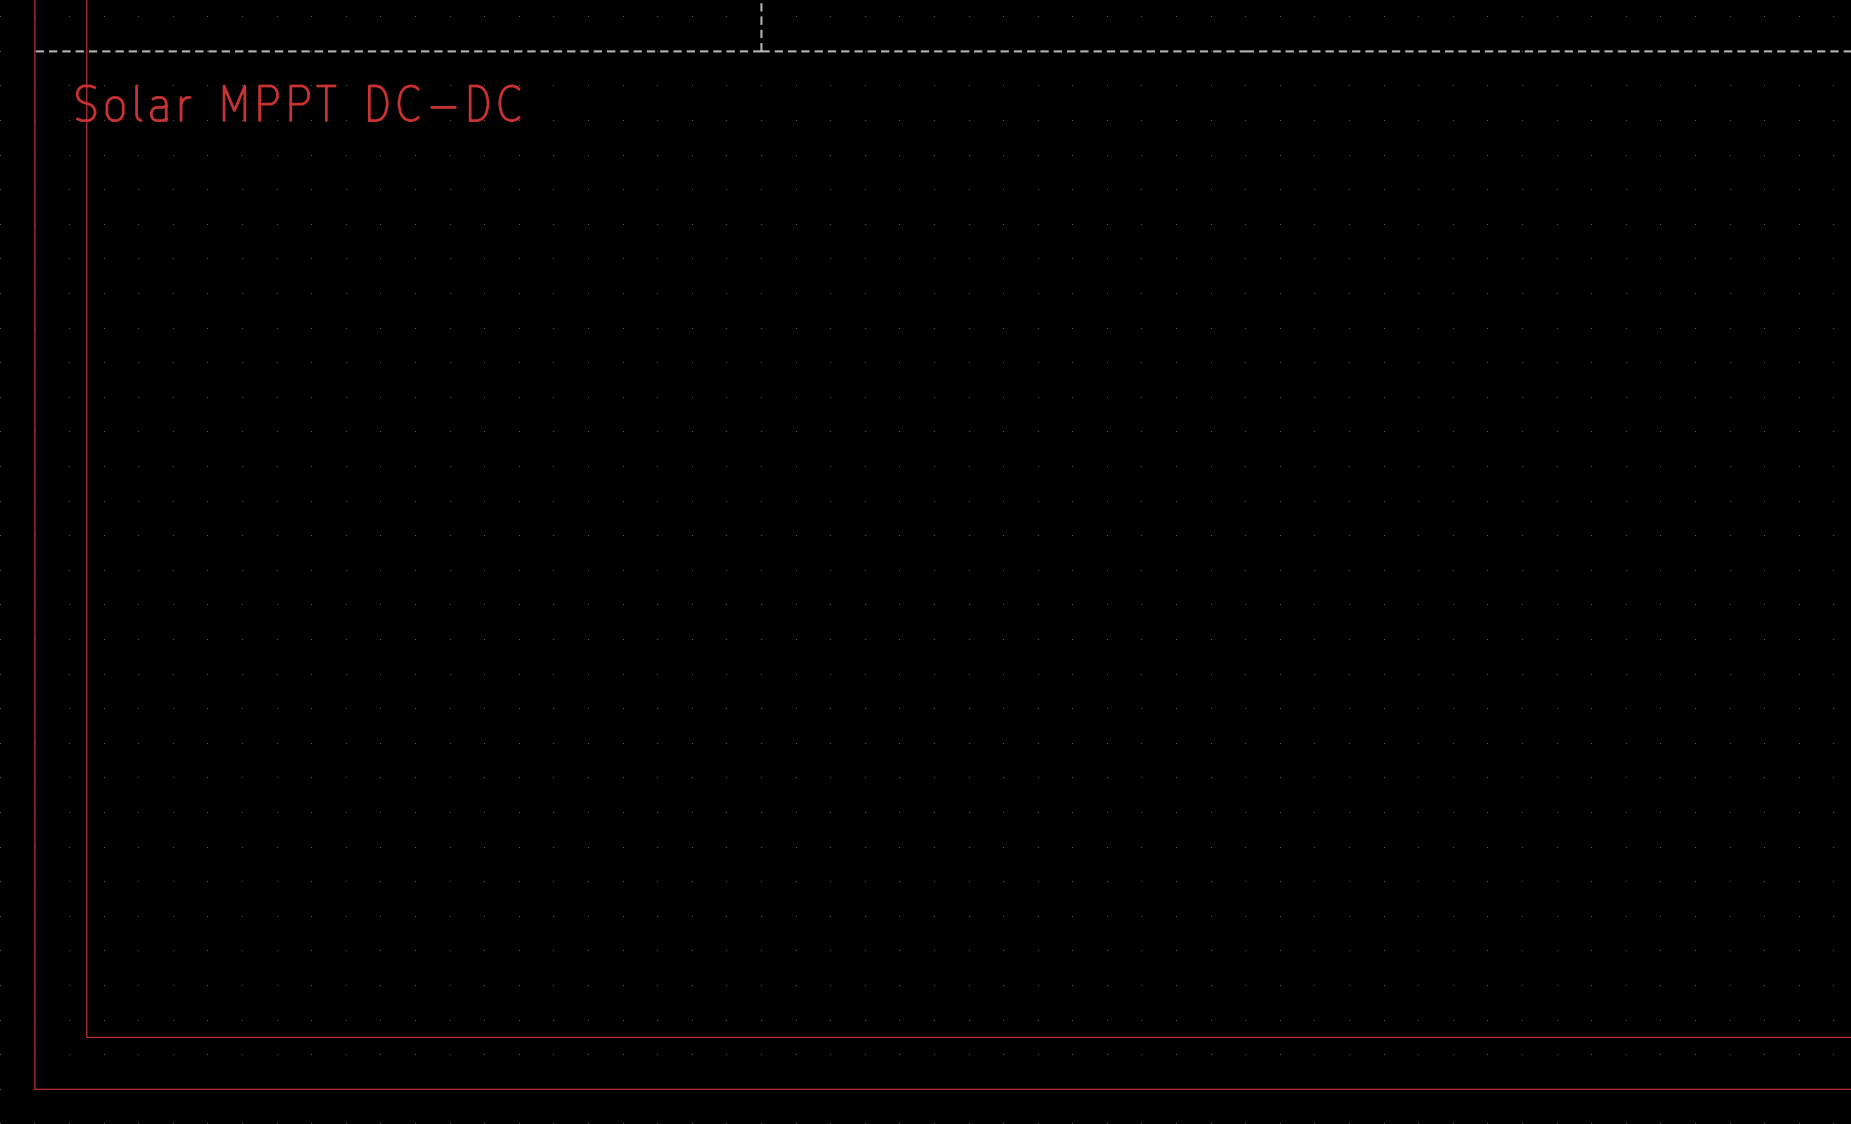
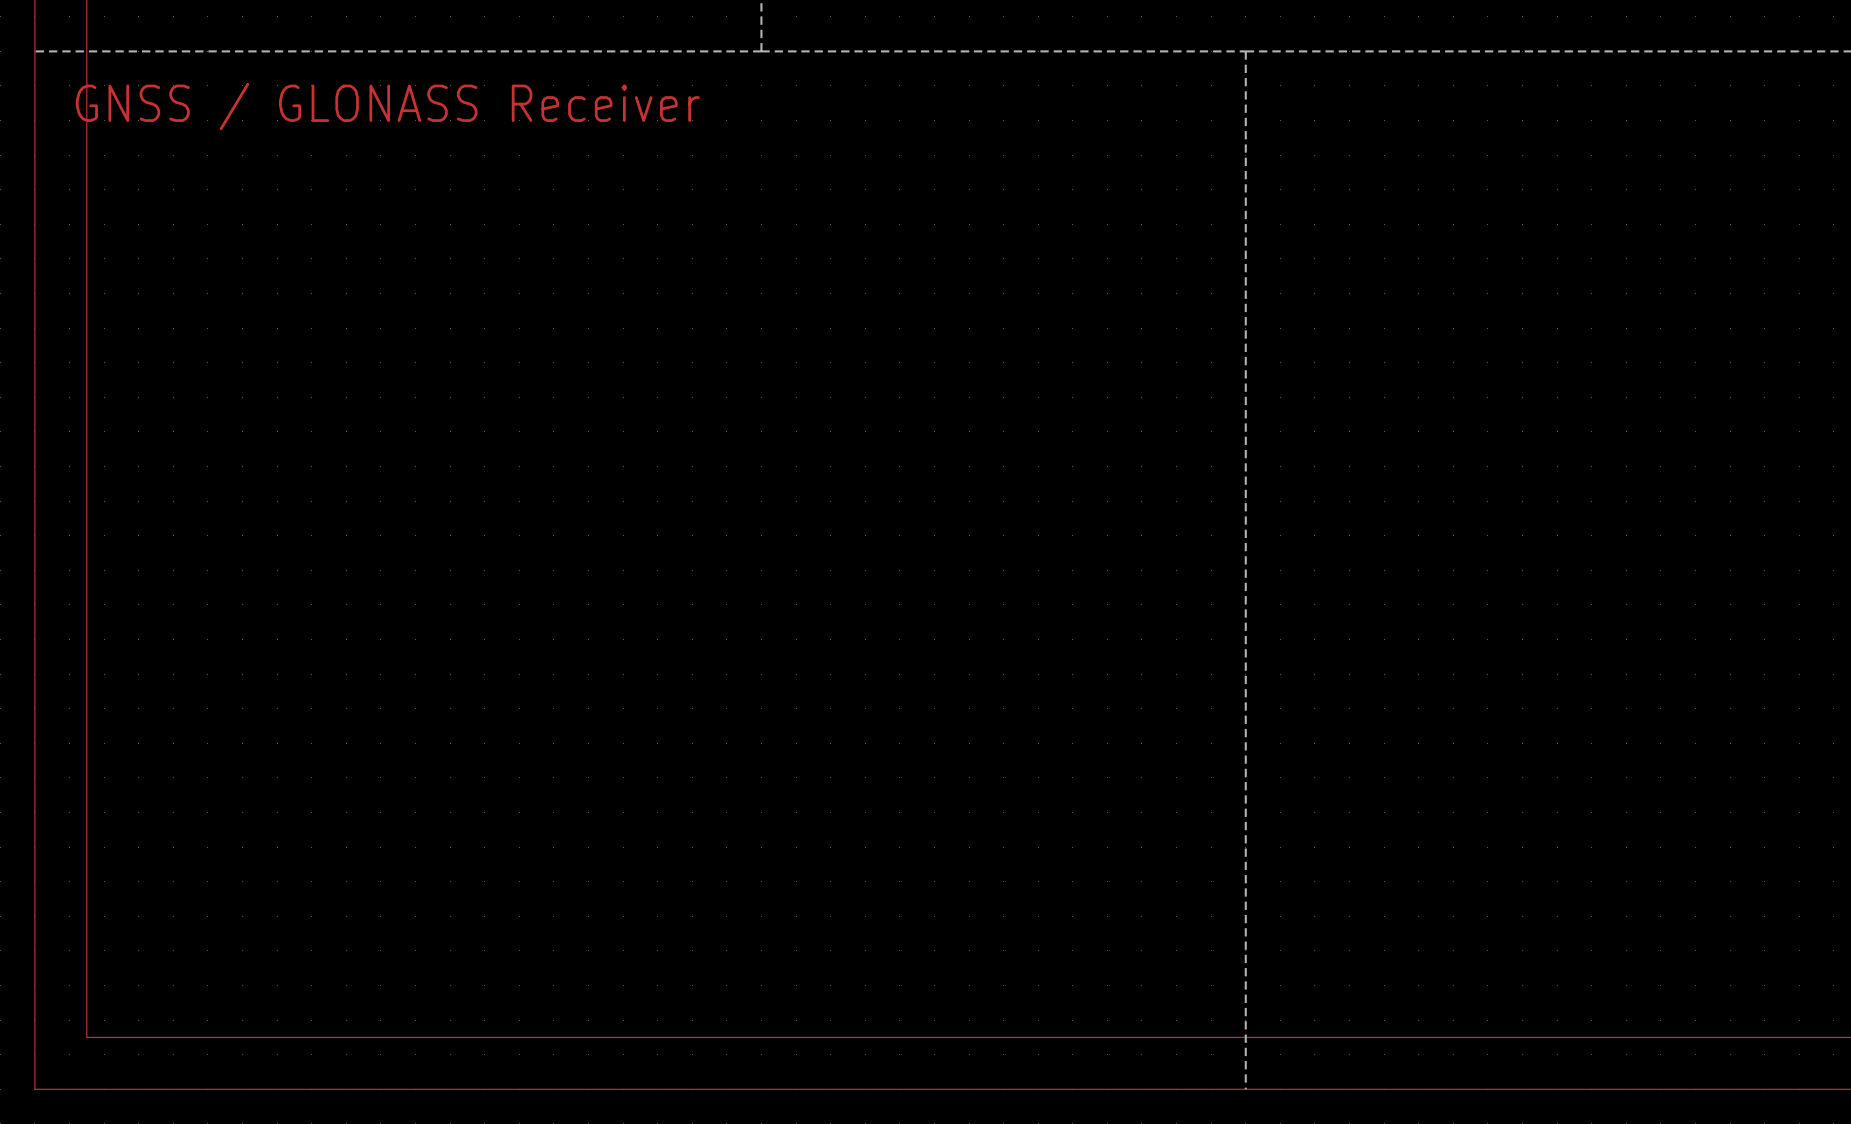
line: none -> (1245, 51) (1245, 1089)
text: Solar MPPT DC-DC (298, 103) -> GNSS / GLONASS Receiver (387, 106)

